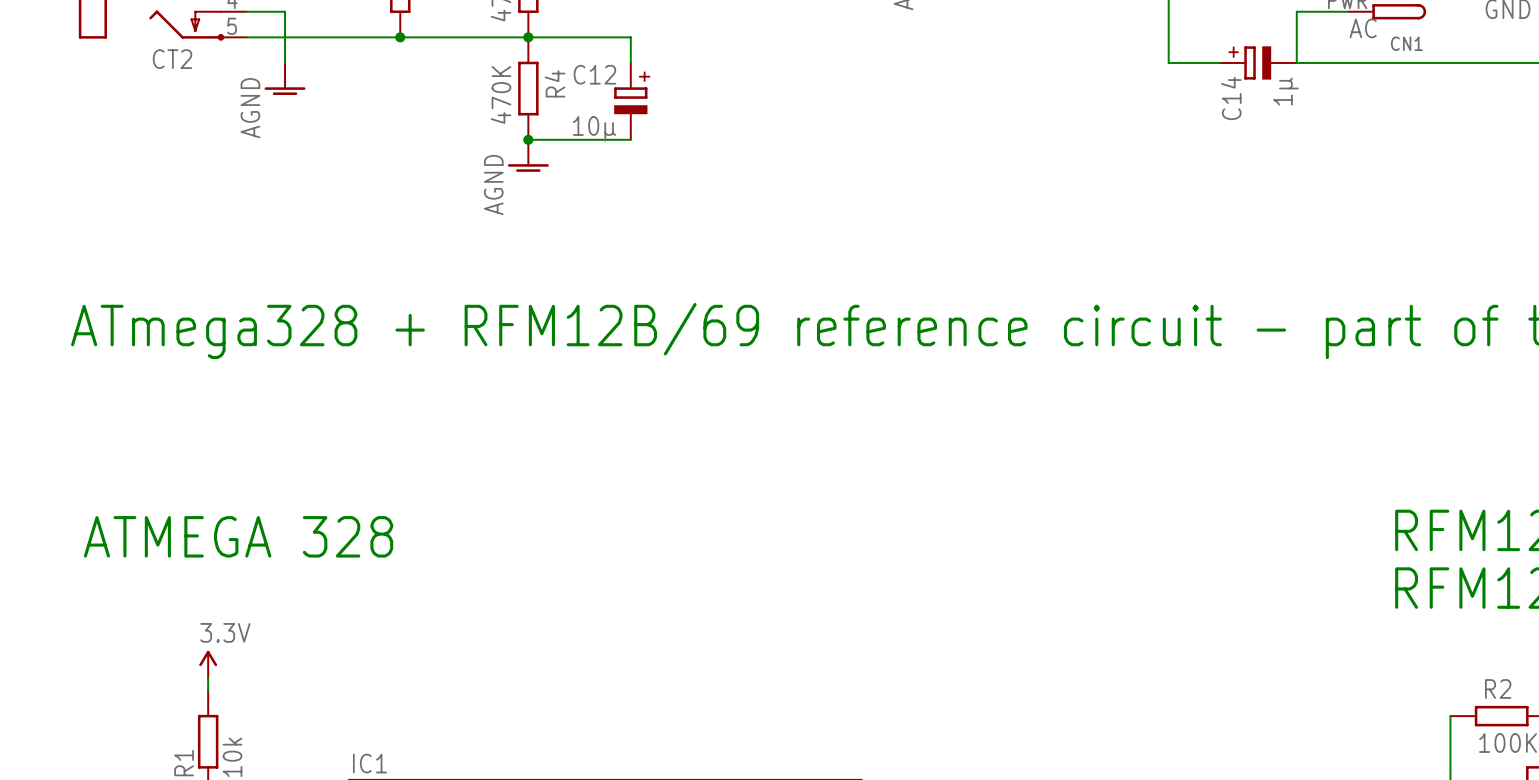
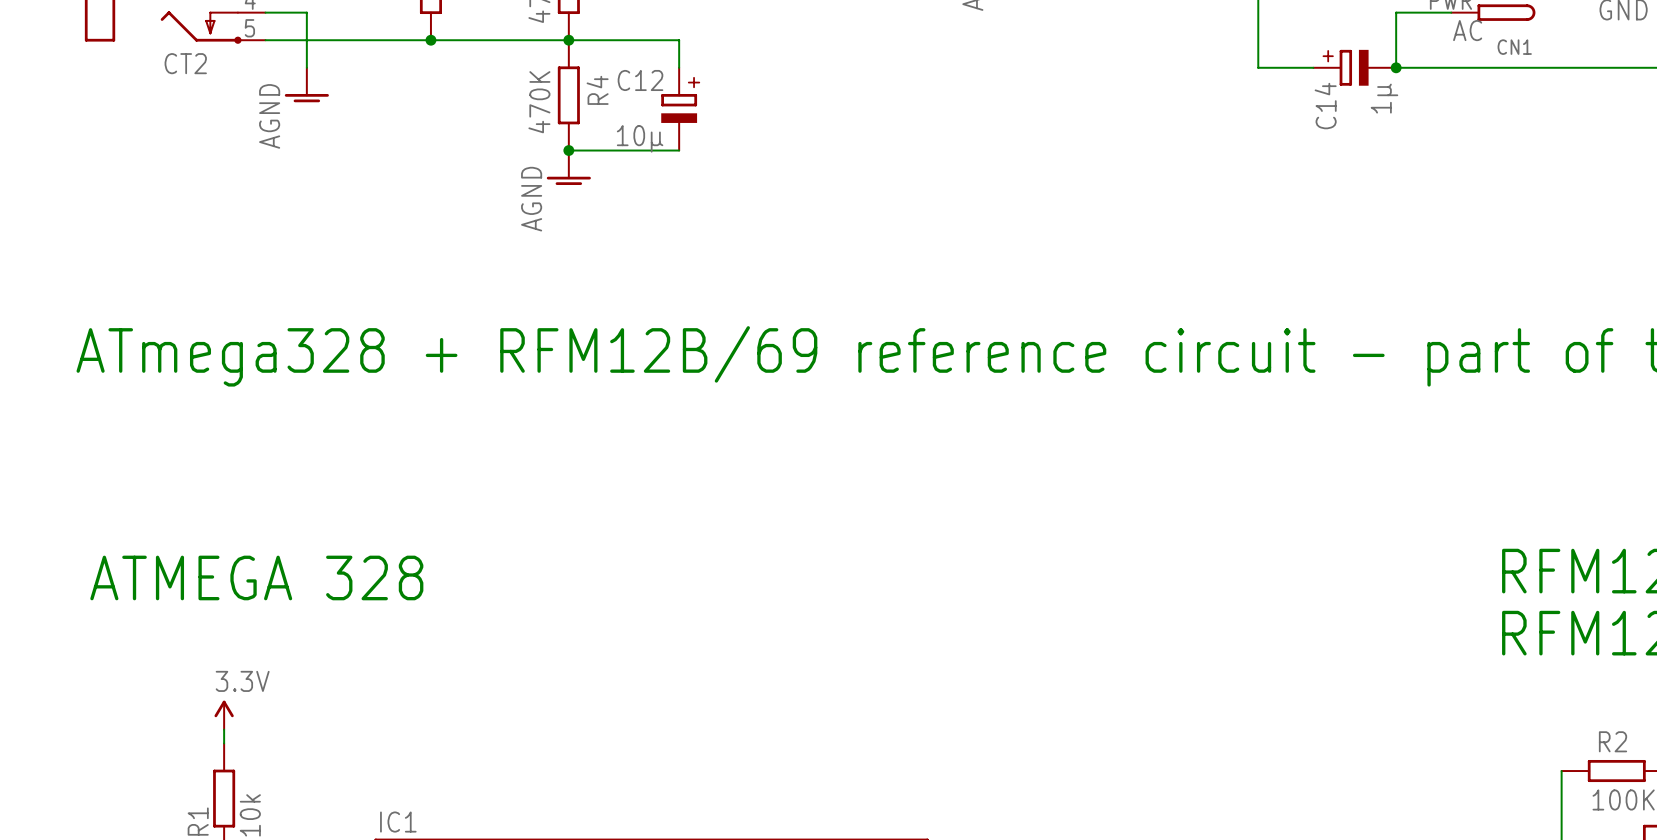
junction: none -> (1396, 67)

